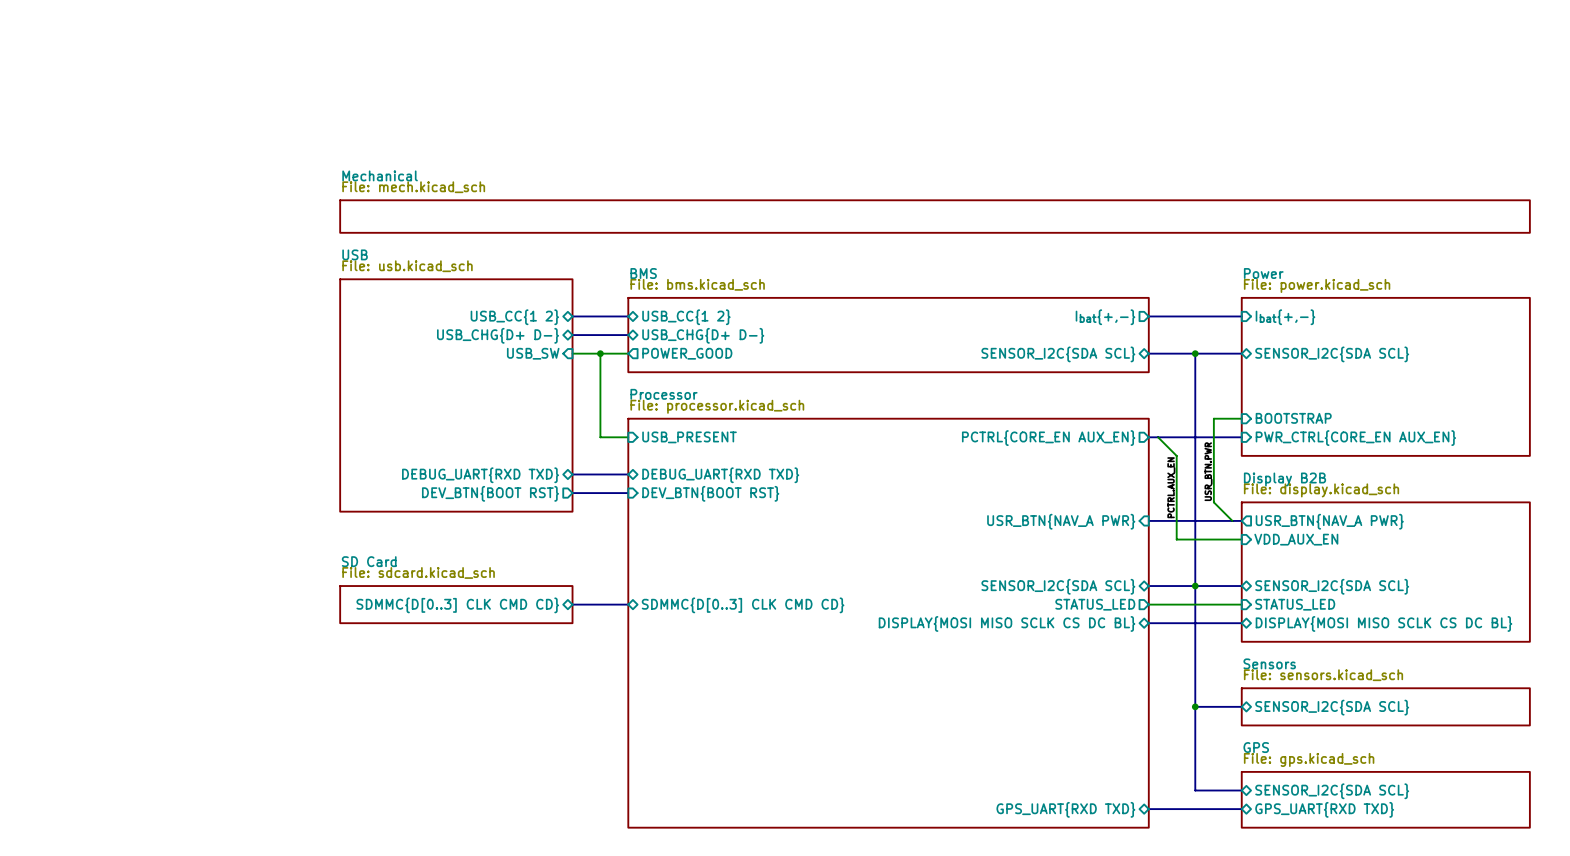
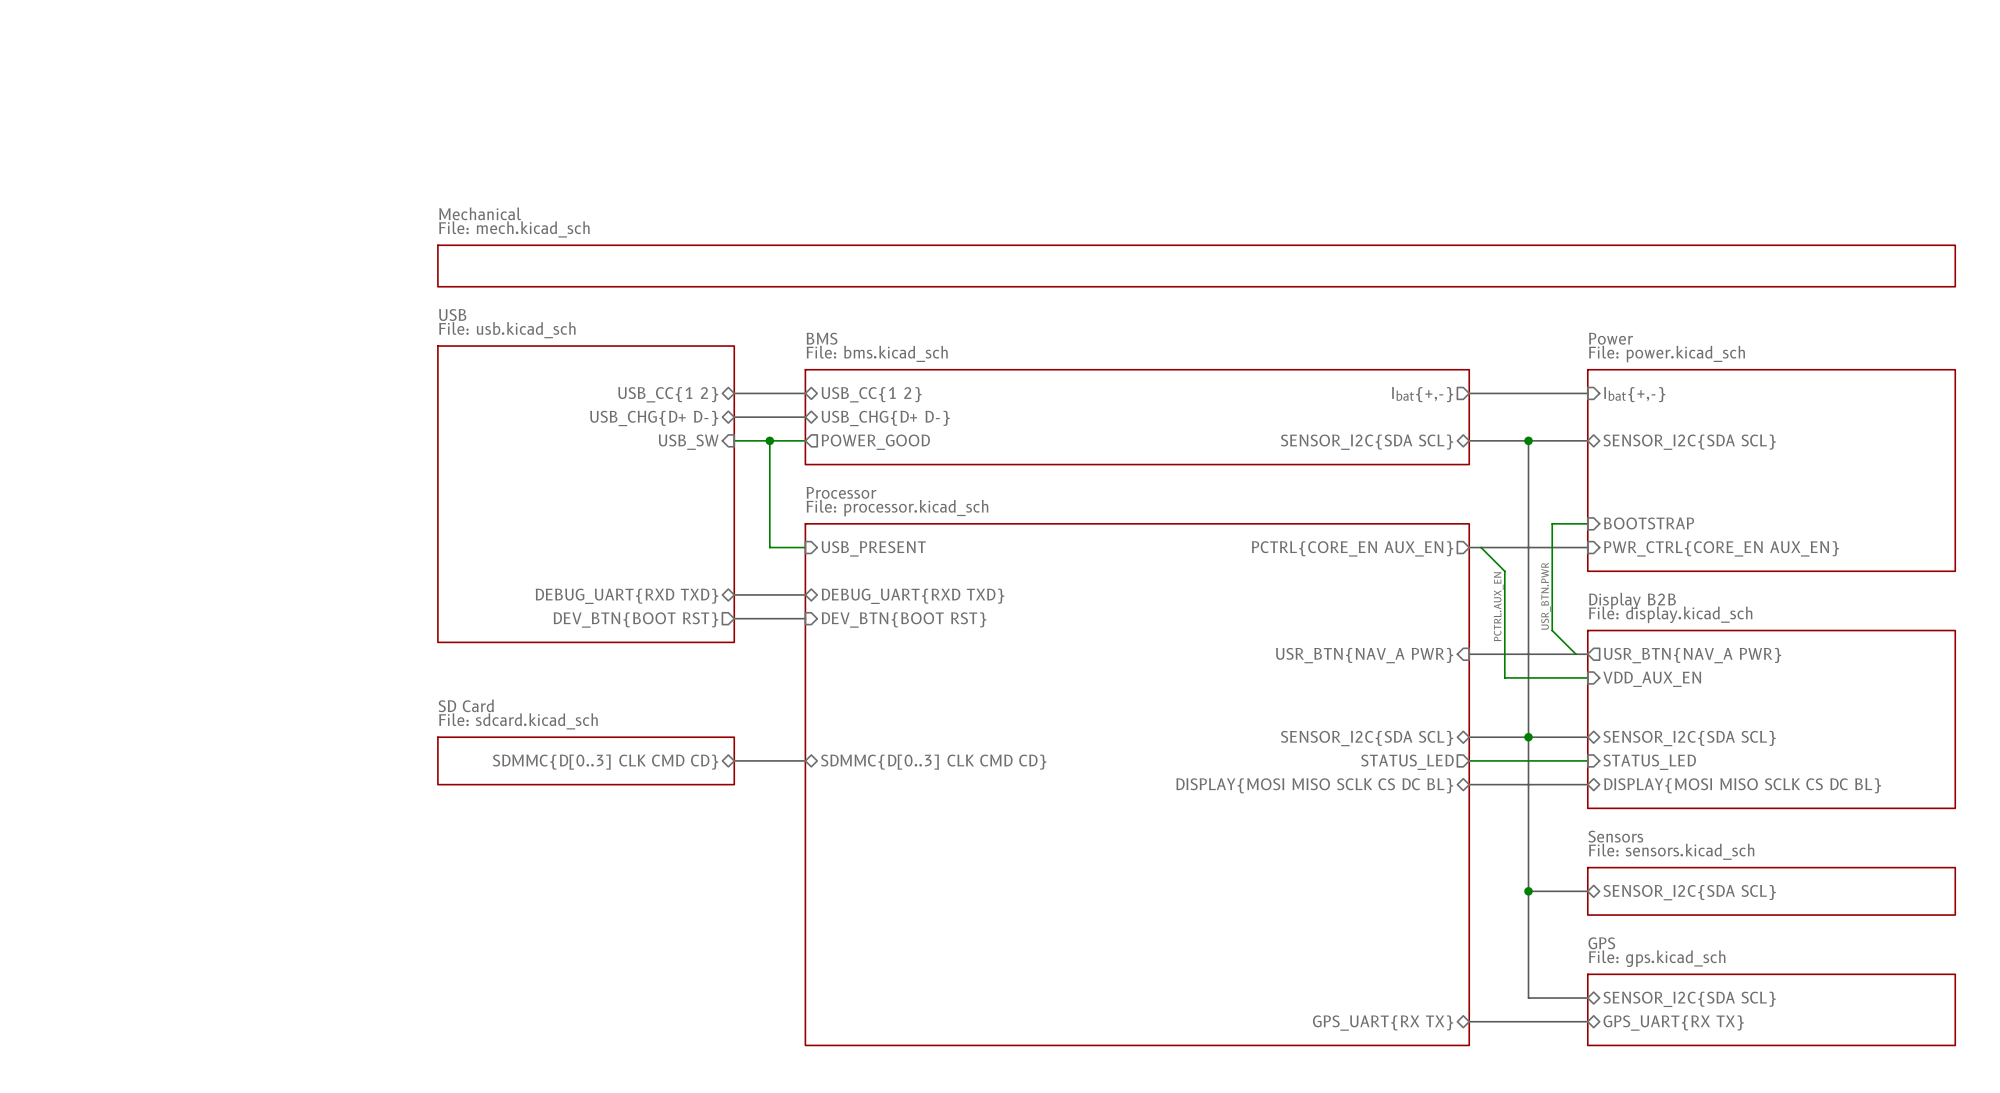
sheet pin: GPS_UART{RXD TXD} (1065, 809) -> GPS_UART{RX TX} (1383, 1023)
sheet pin: GPS_UART{RXD TXD} (1324, 809) -> GPS_UART{RX TX} (1673, 1023)

